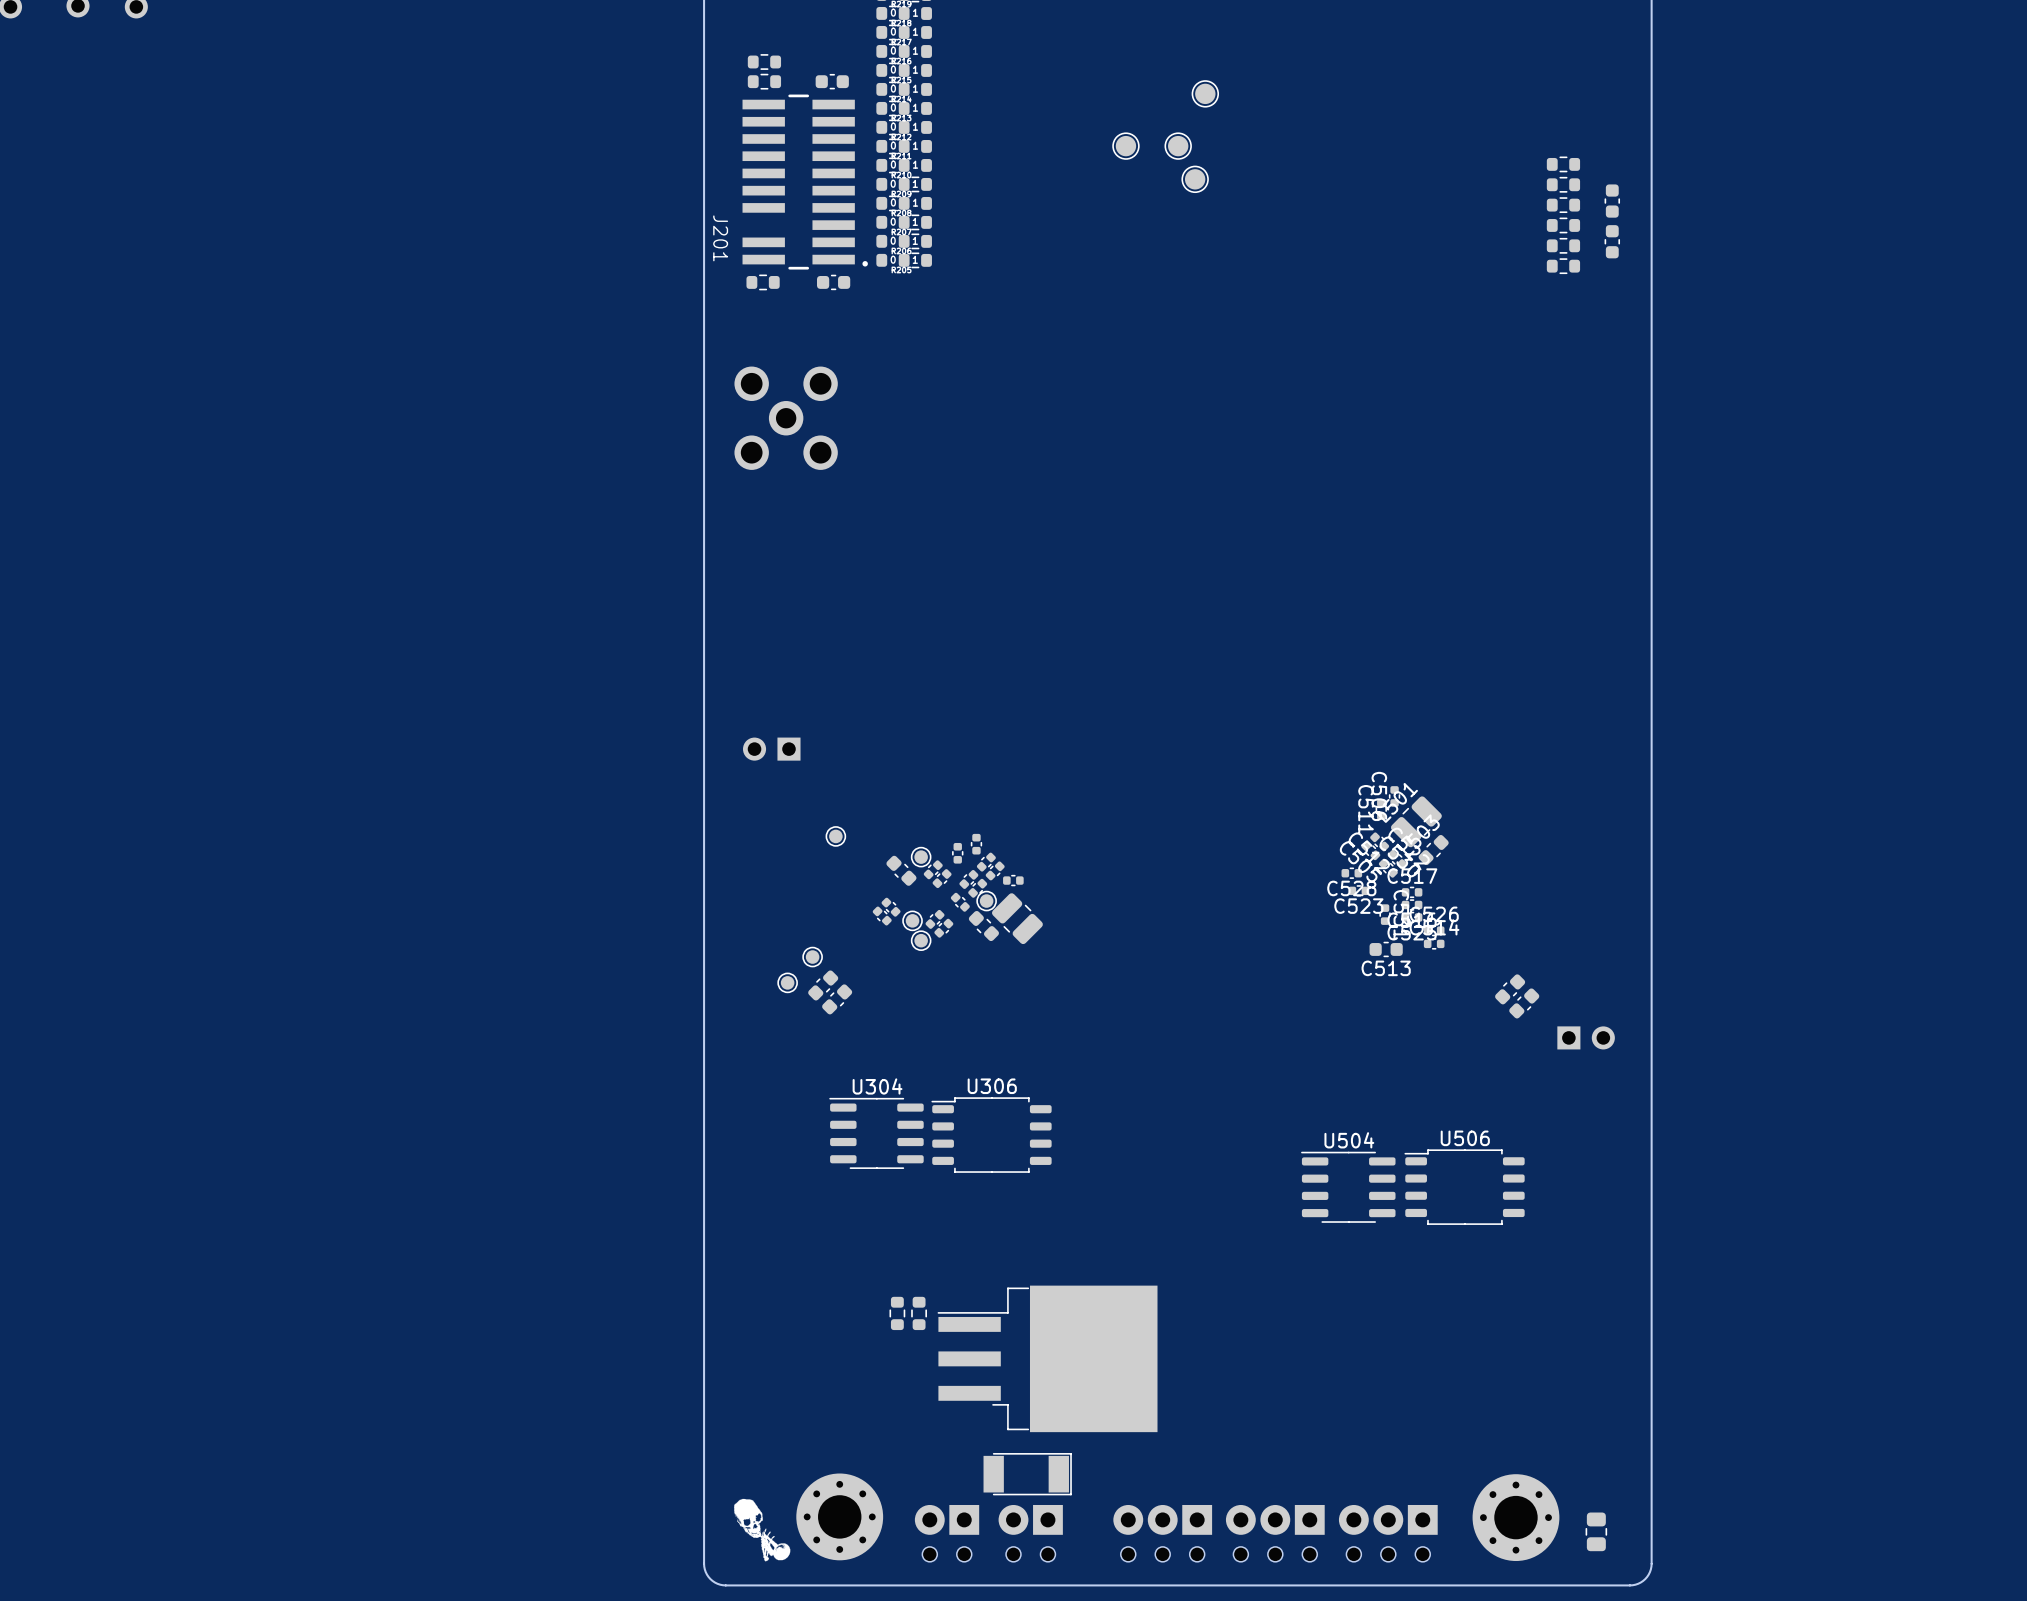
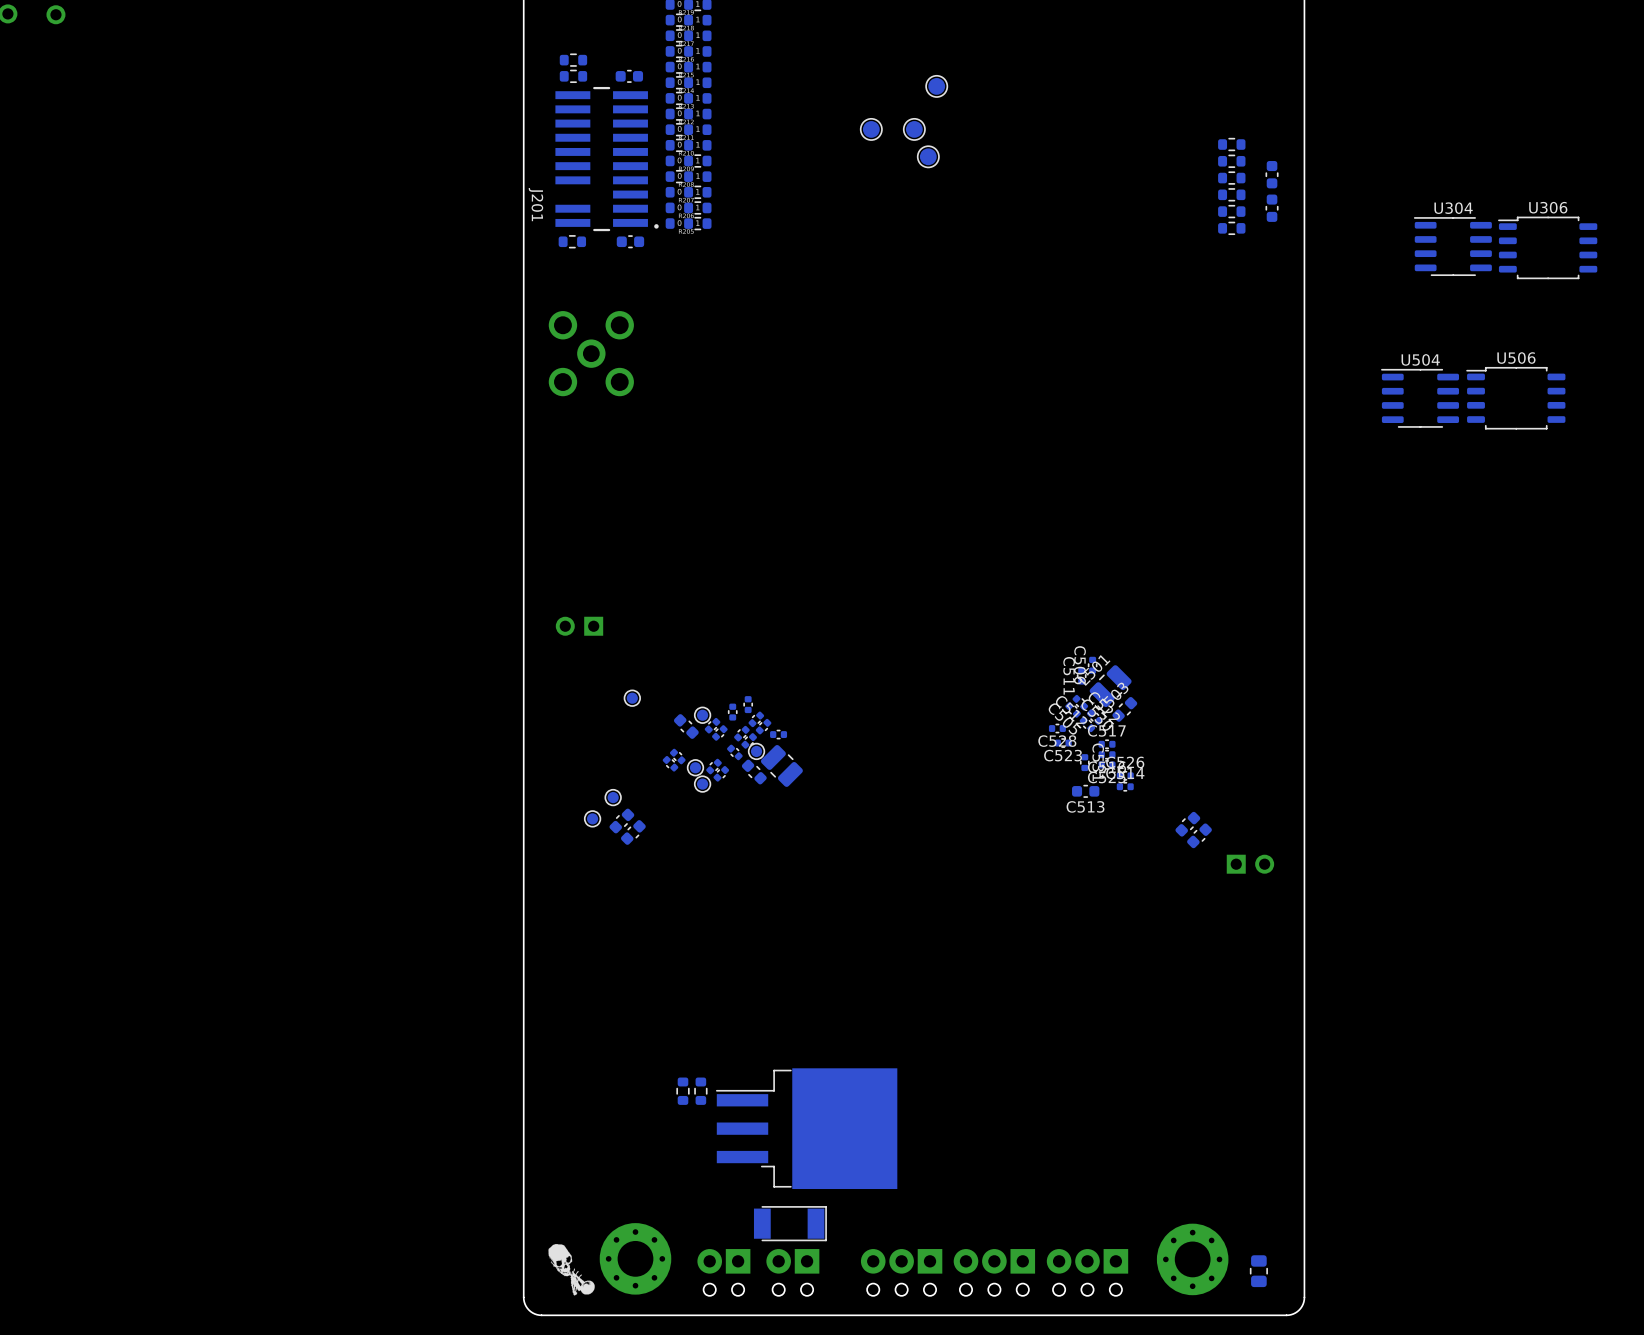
U304 position: (876, 1133) -> (1452, 246)
U306 position: (991, 1135) -> (1547, 247)
U504 position: (1348, 1187) -> (1420, 398)
U506 position: (1464, 1187) -> (1515, 398)

